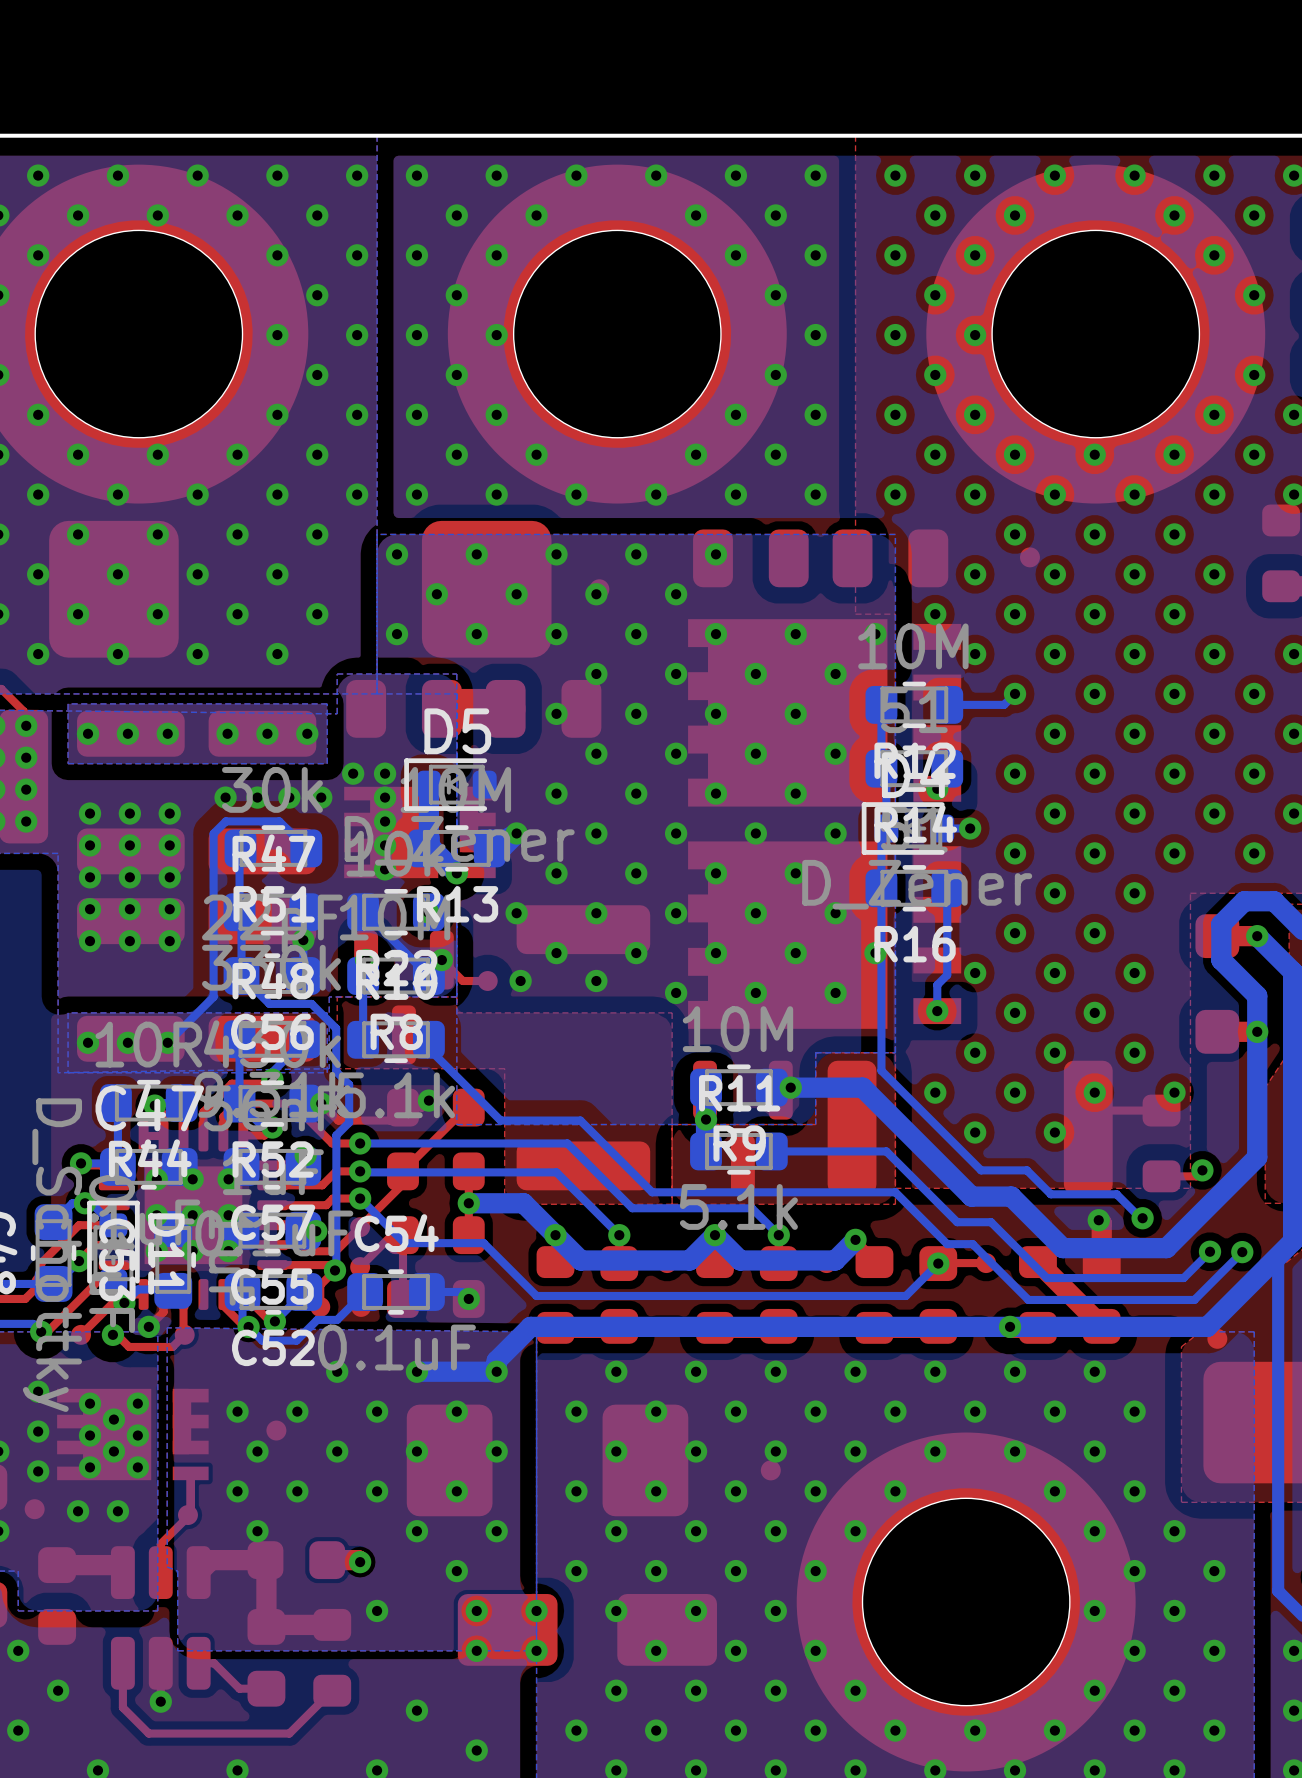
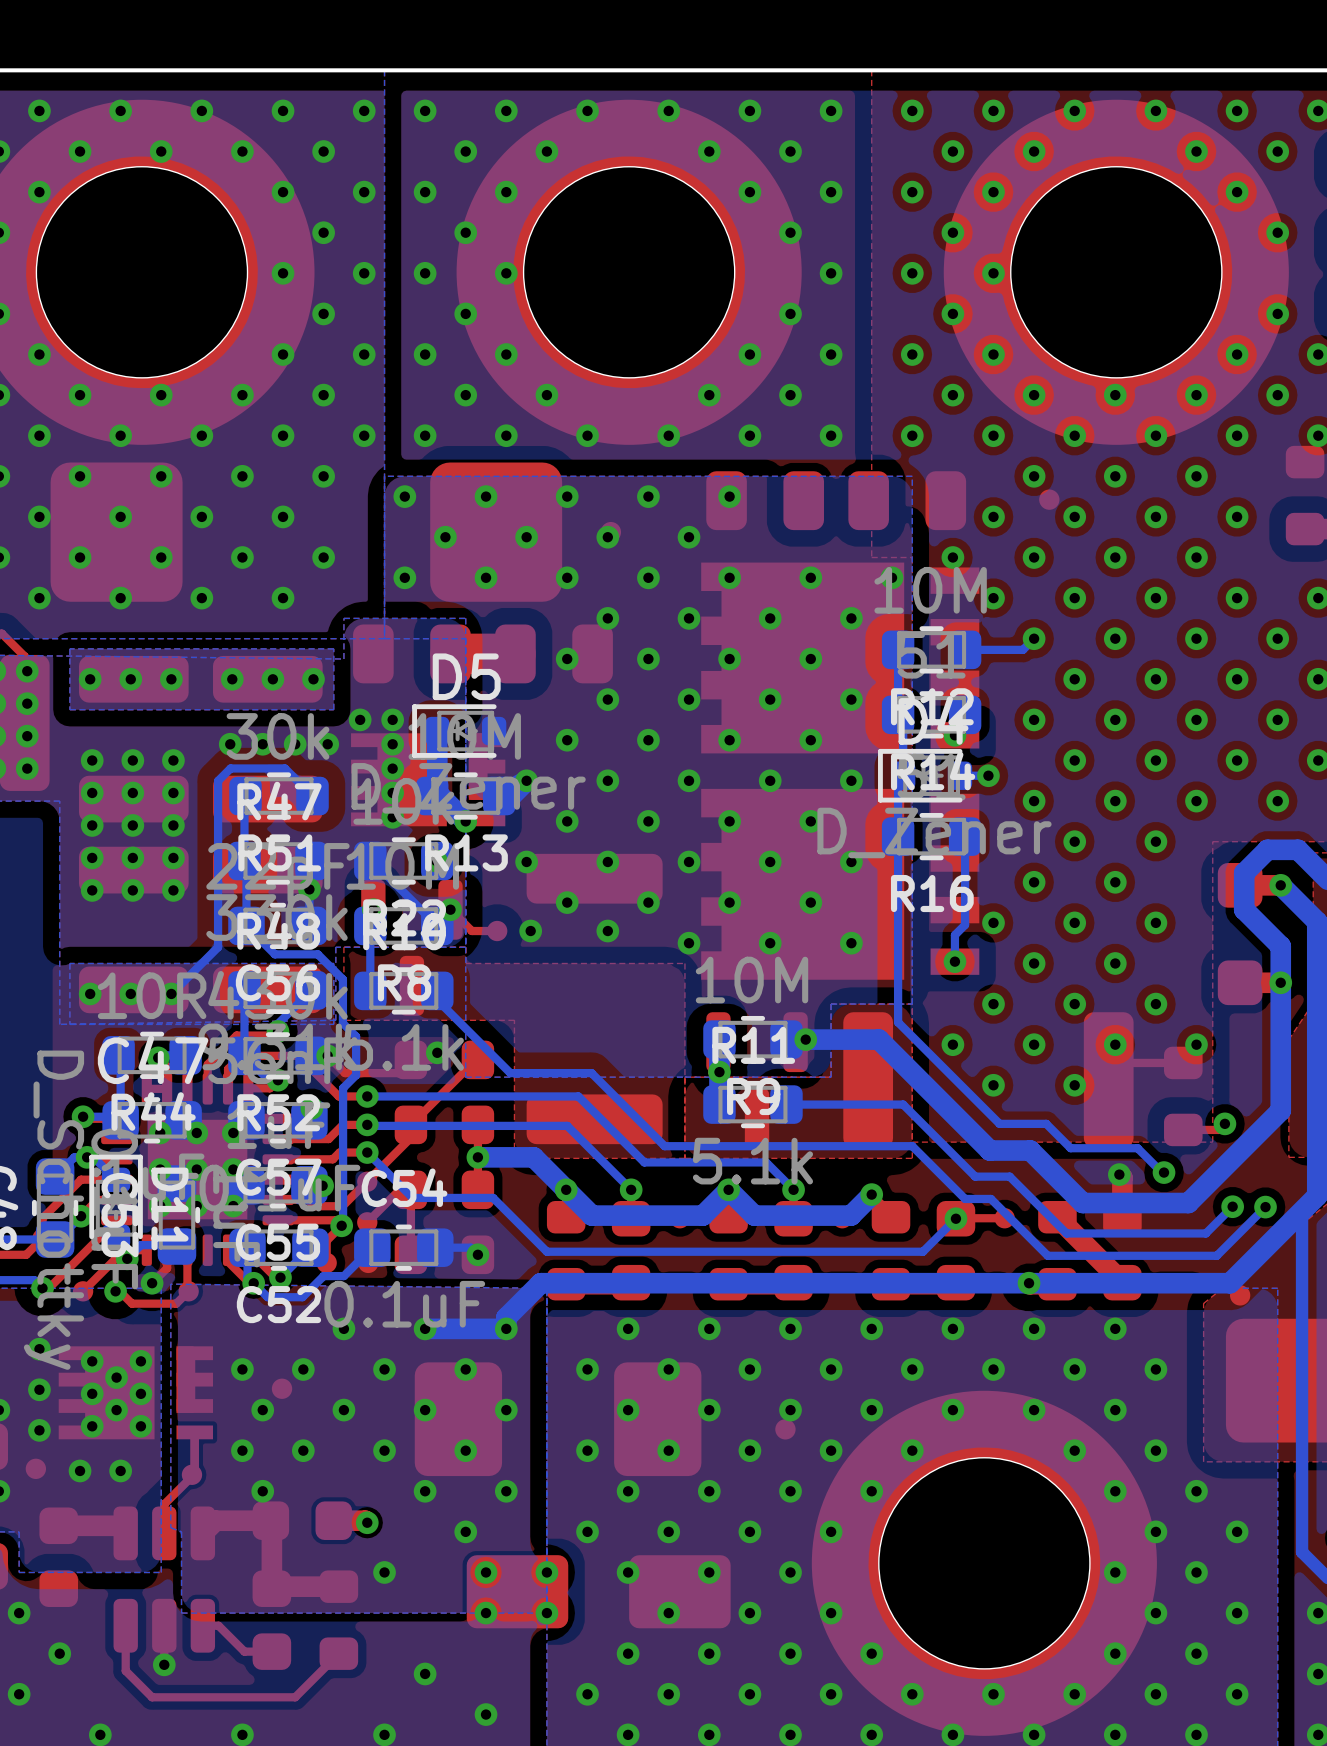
via: (875, 953) -> none

